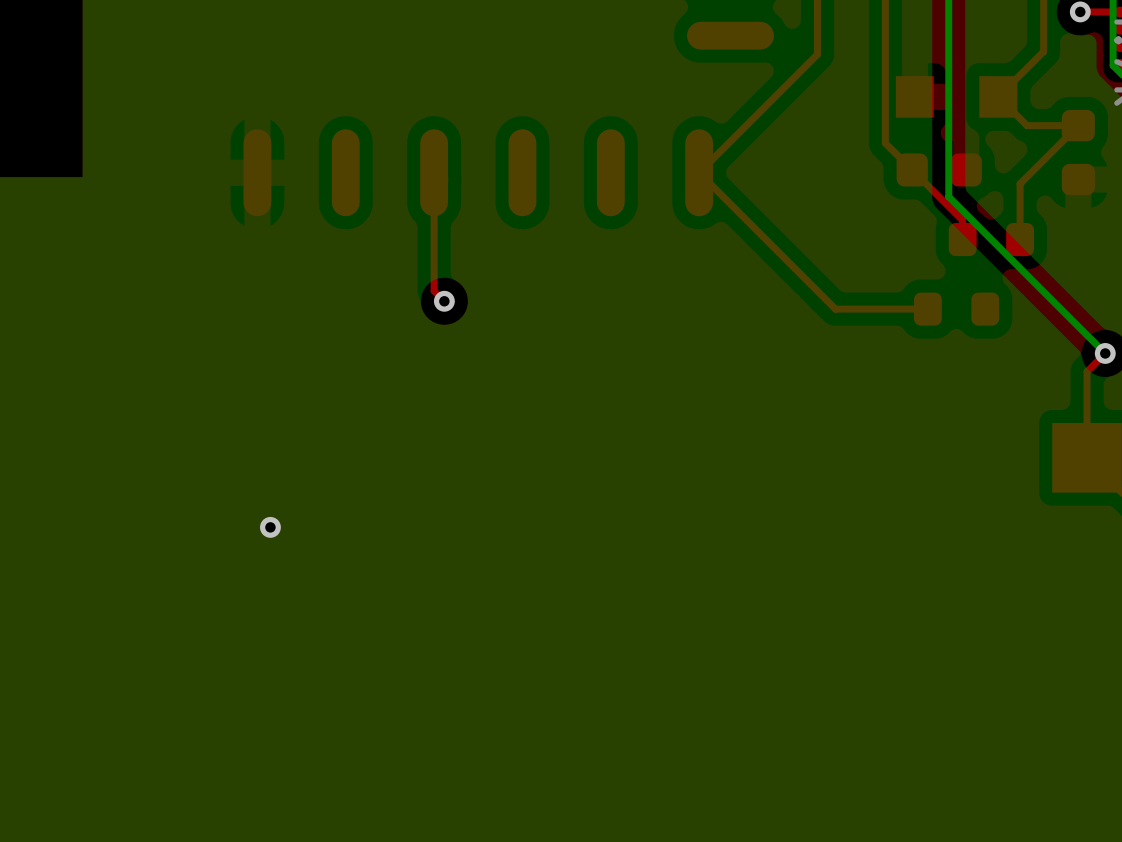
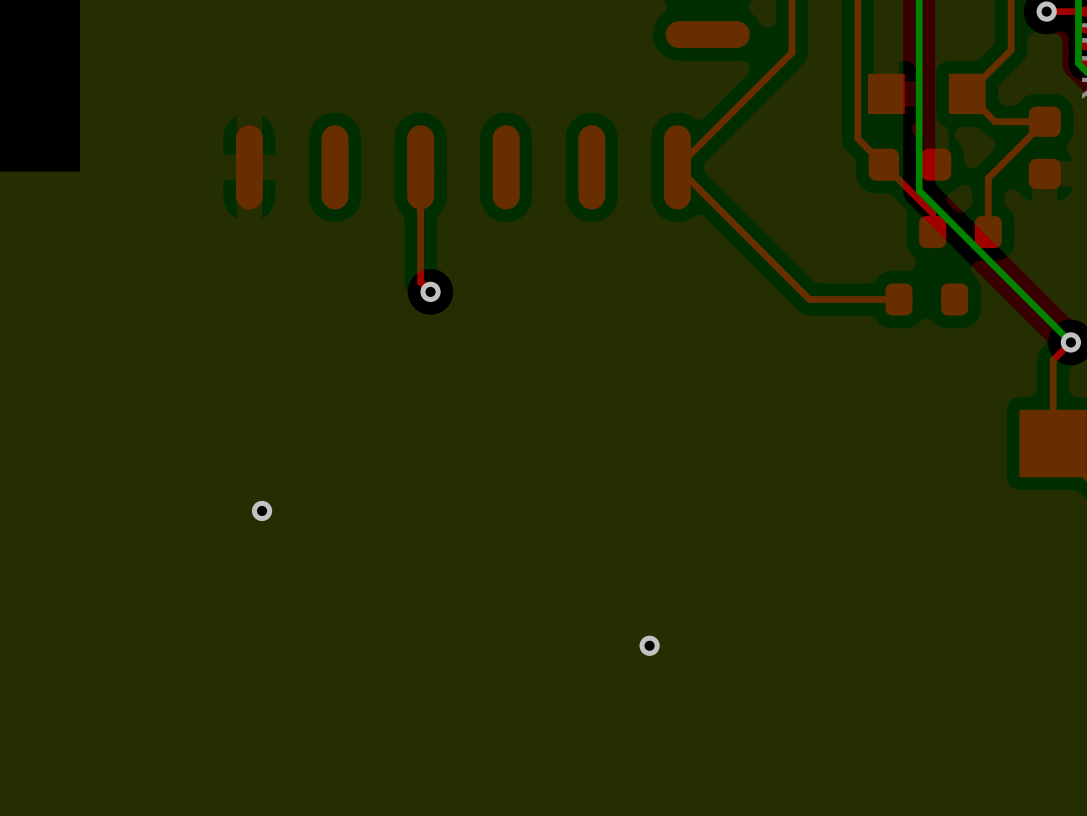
via: none -> (649, 645)

